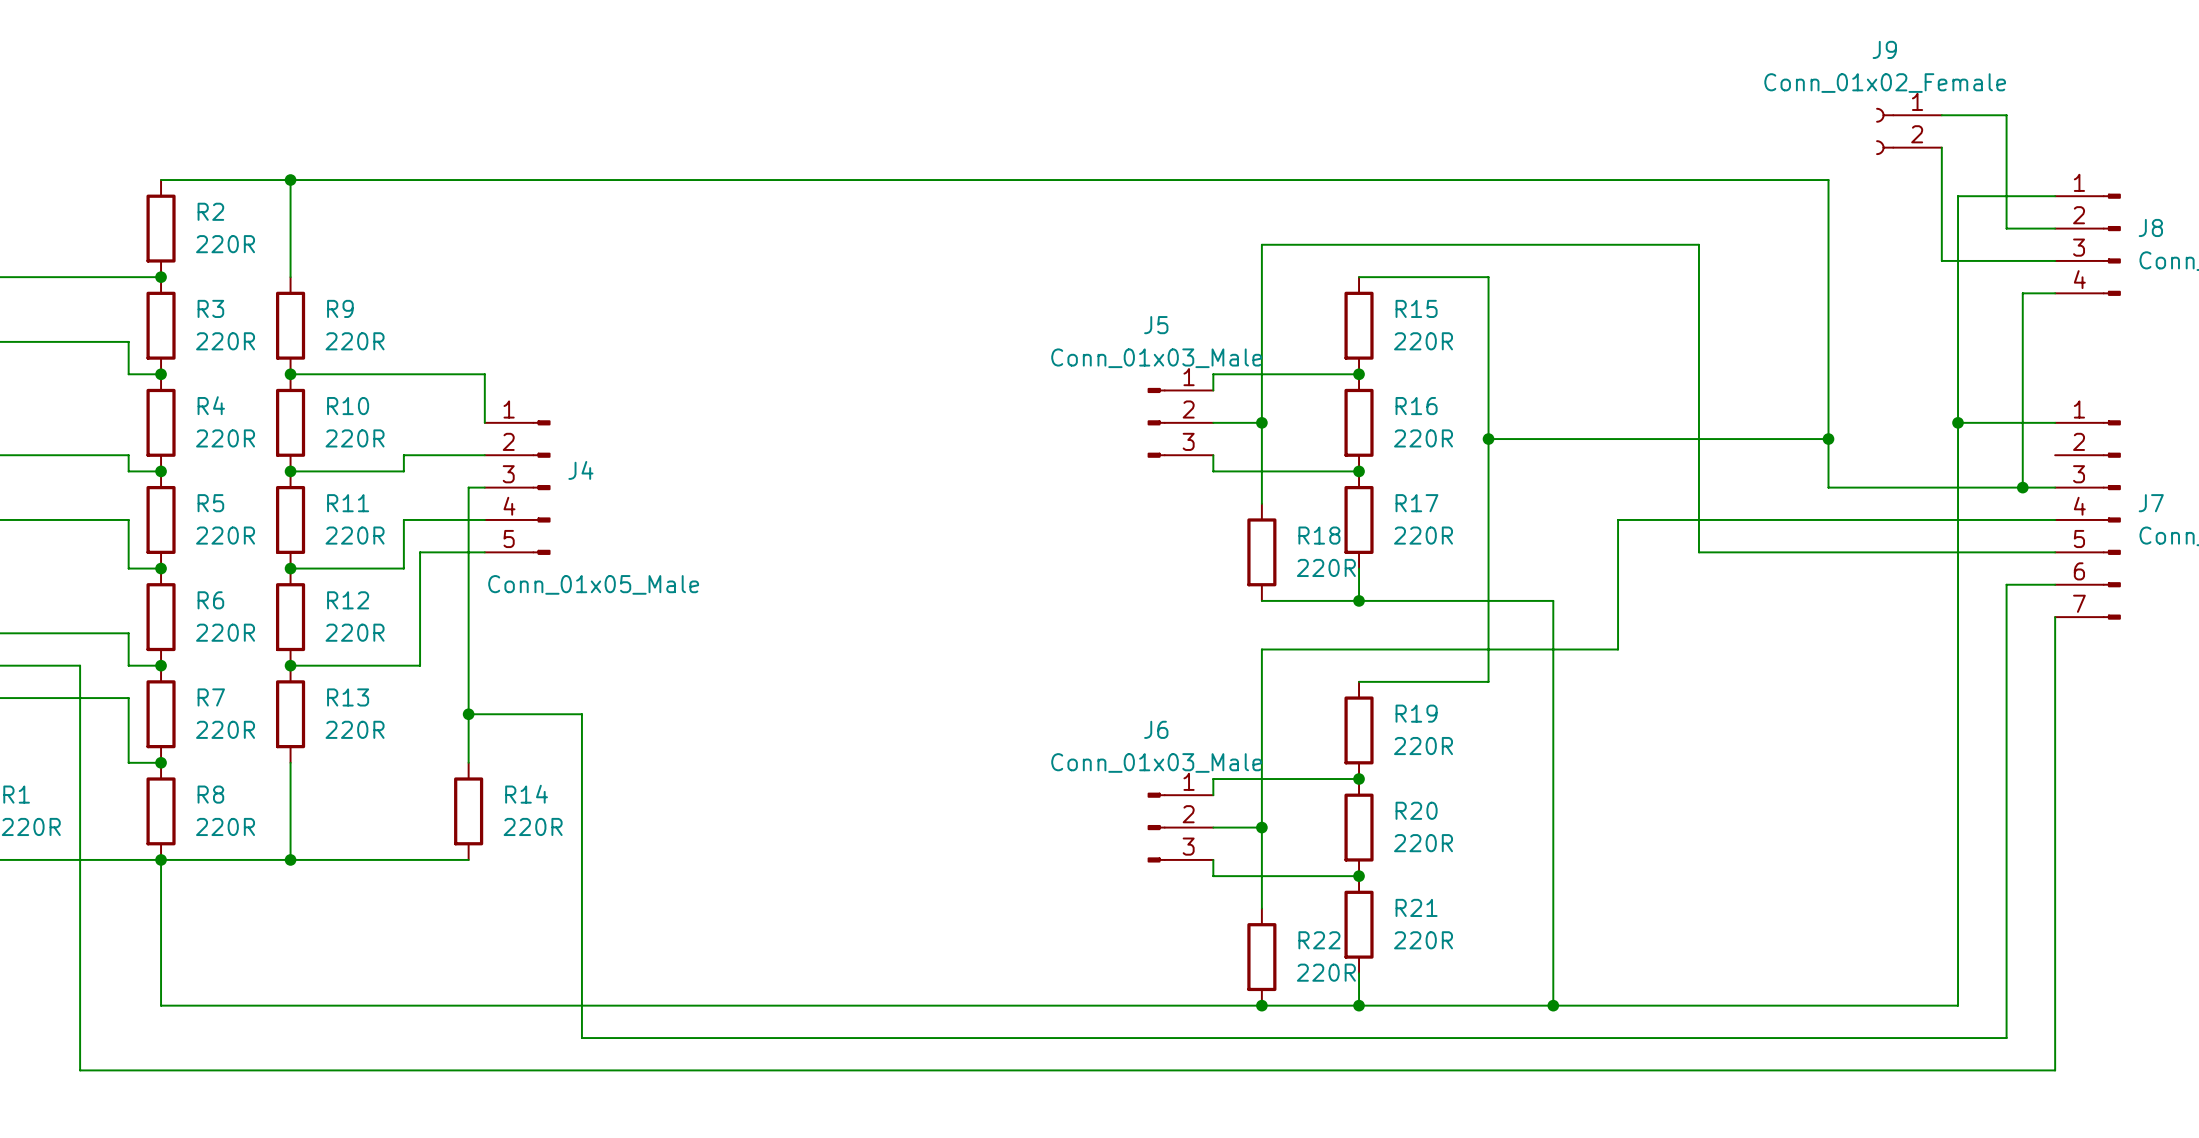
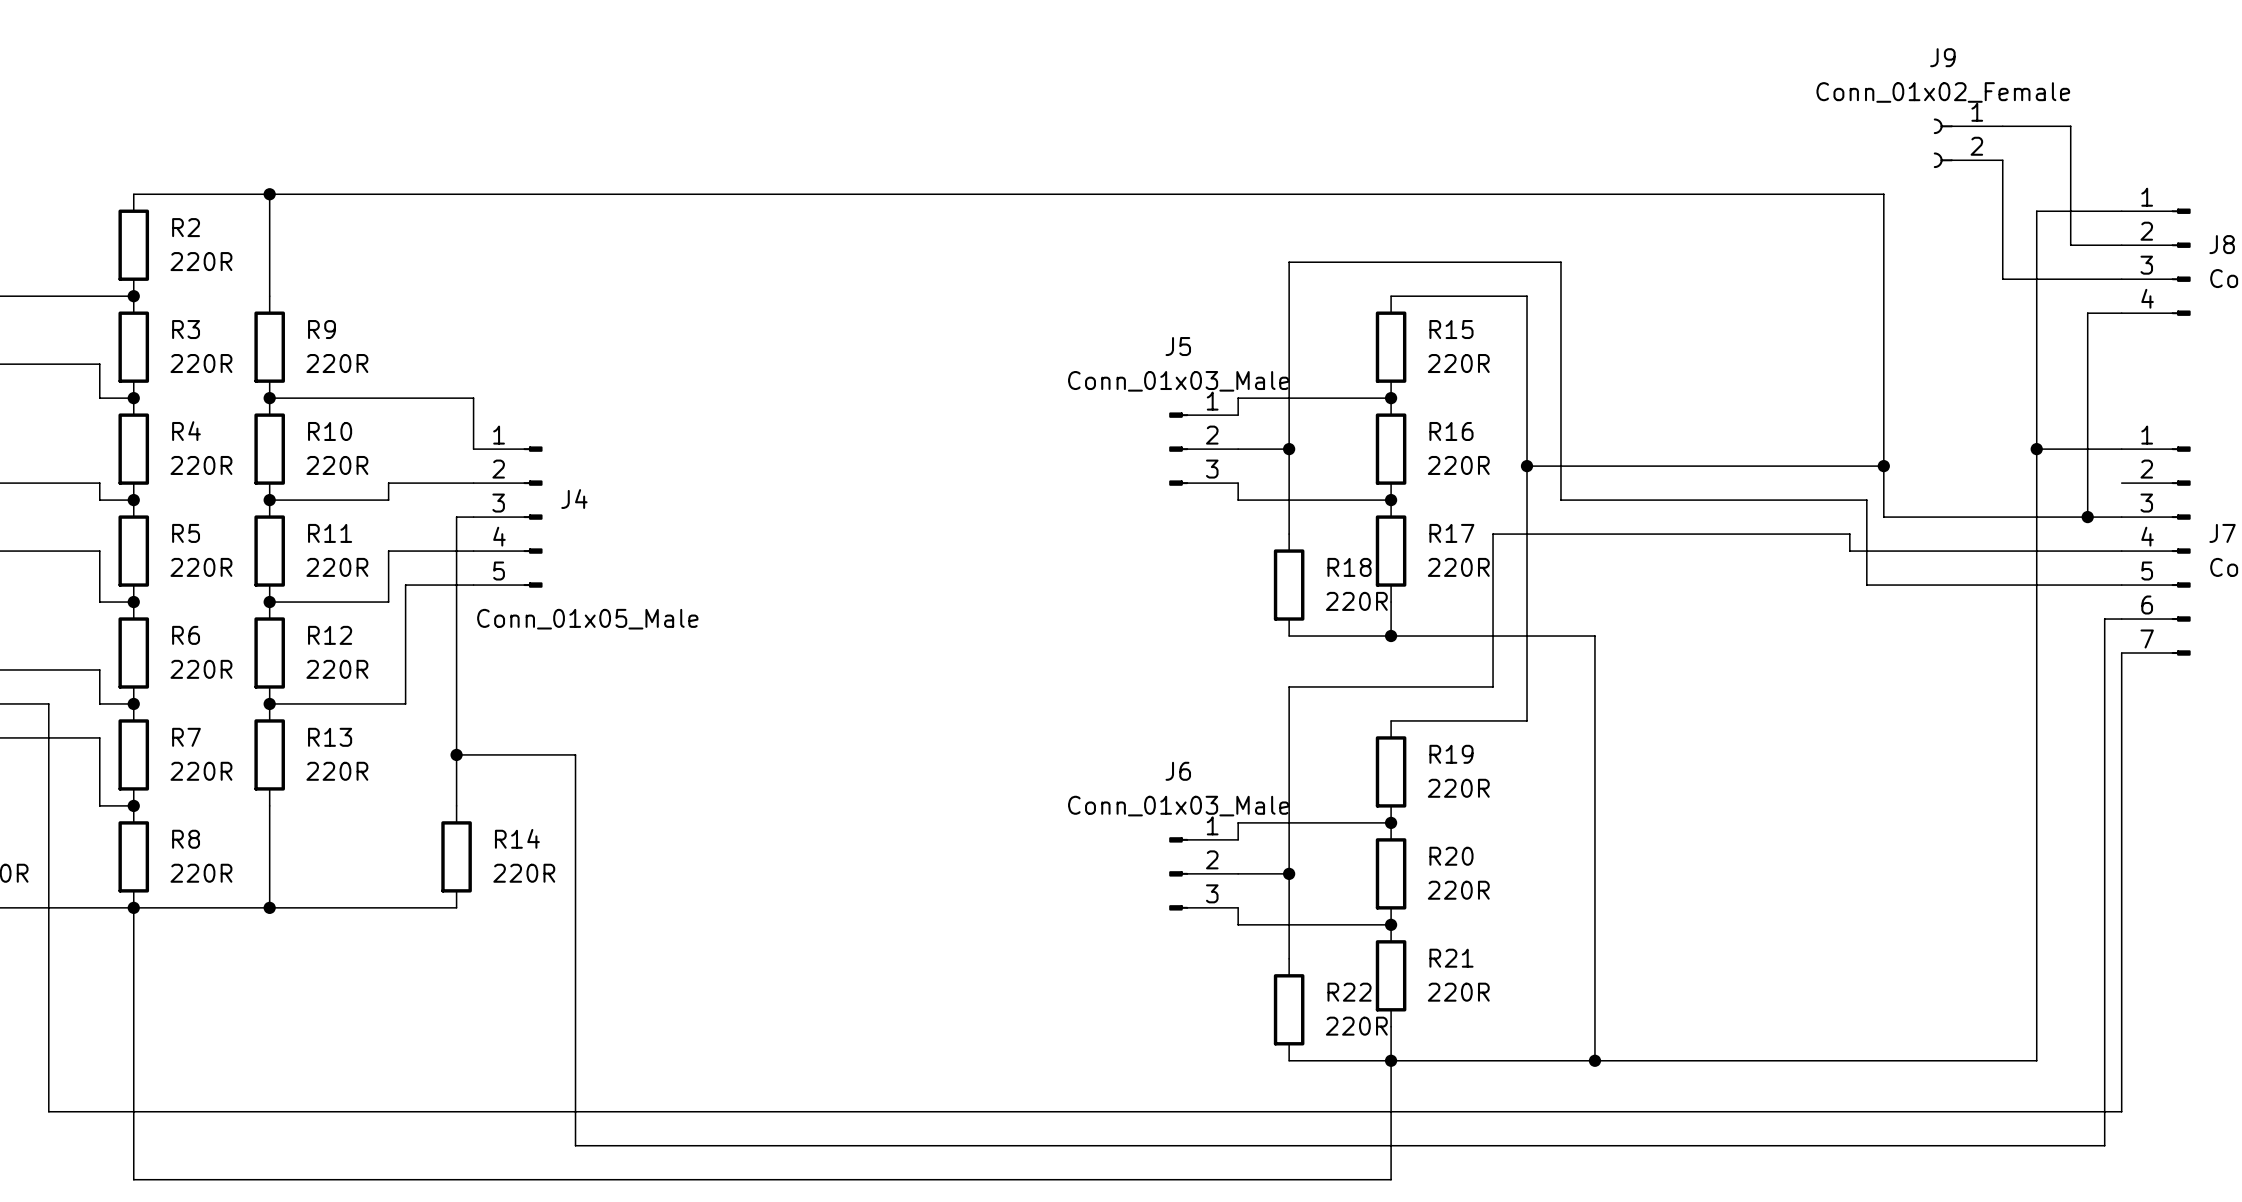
wire: (1974, 196) (1958, 196) (1958, 1005) -> (2036, 211) (2036, 1060) (2019, 1060)
wire: (1520, 244) (1698, 244) (1698, 552) (1812, 552) -> (1560, 262) (1560, 500) (1866, 500) (1866, 585)
wire: (1958, 422) (1974, 422) -> none
junction position: (1958, 422) -> (2036, 449)
wire: (1796, 519) (1618, 519) (1618, 649) (1456, 649) -> (1849, 551) (1849, 534) (1493, 534) (1493, 686)
wire: (2038, 584) (2006, 584) (2006, 1038) (581, 1038) -> (2104, 619) (2104, 1145) (575, 1145) (575, 1094)
wire: (161, 1005) (1261, 1005) -> (133, 1060) (133, 1179) (1391, 1179) (1391, 1060)
junction: (1261, 1005) -> none
wire: (80, 1054) (80, 1070) (2055, 1070) (2055, 1054) -> (48, 1111) (2121, 1111)

